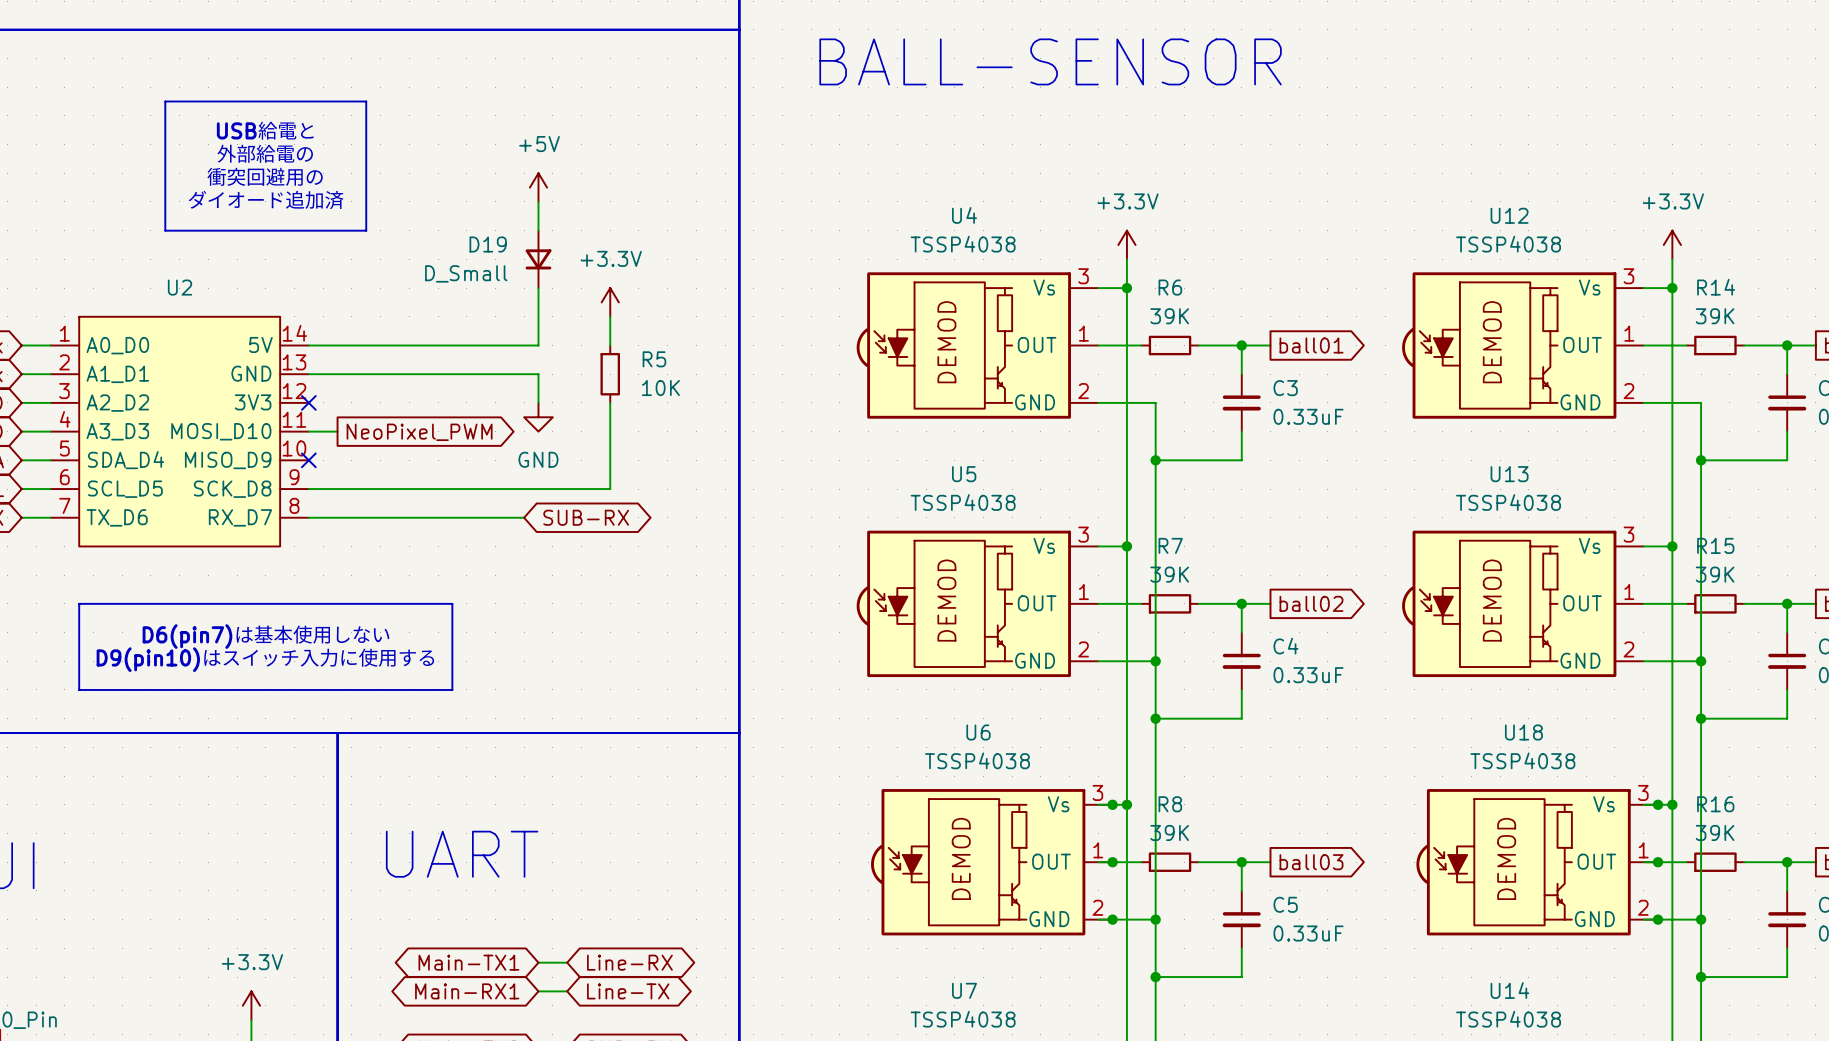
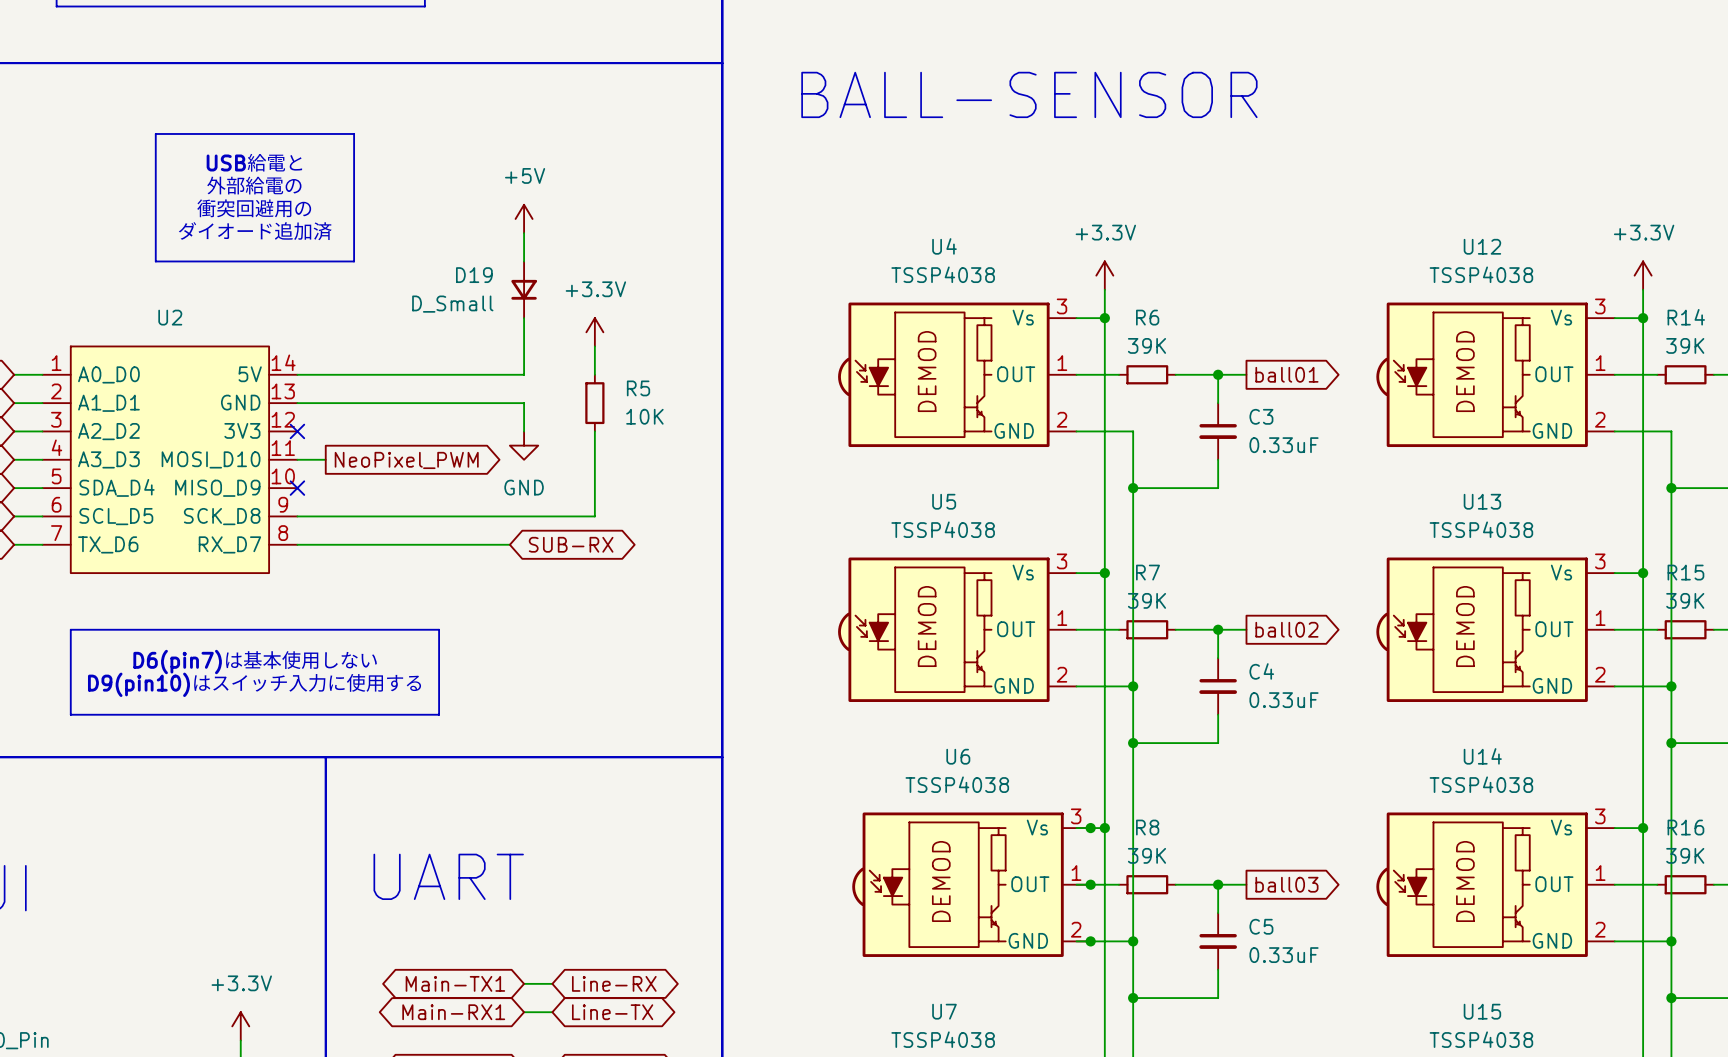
junction: (1658, 804) -> none
U14: none -> TSSP4038 (1495, 884)
U18: TSSP4038 (1537, 862) -> none
junction: (1658, 862) -> none
junction: (1658, 919) -> none
U14 name: U14 (1509, 990) -> U15 (1482, 1011)

